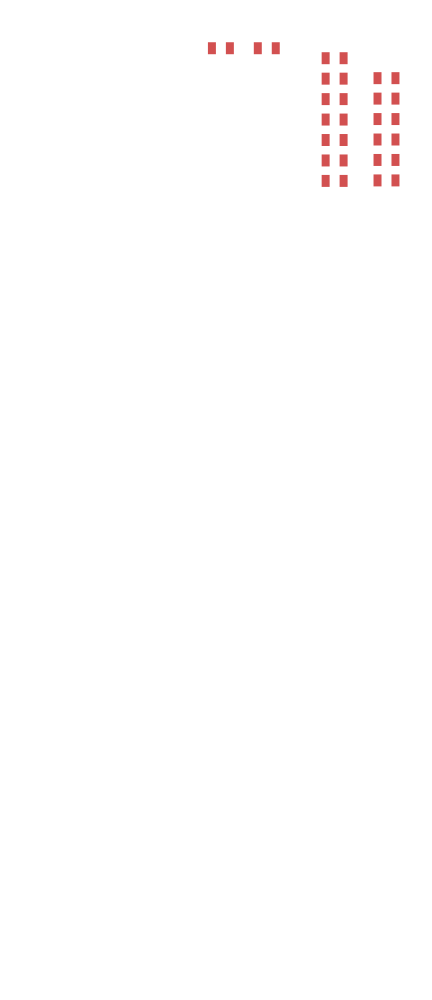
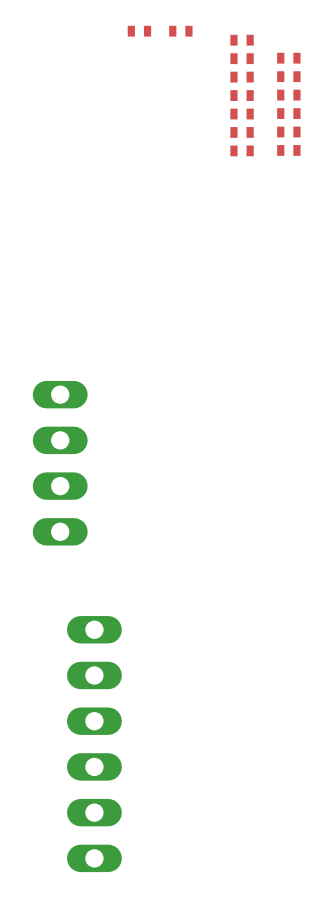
part: none -> (60, 463)
part: none -> (94, 744)

